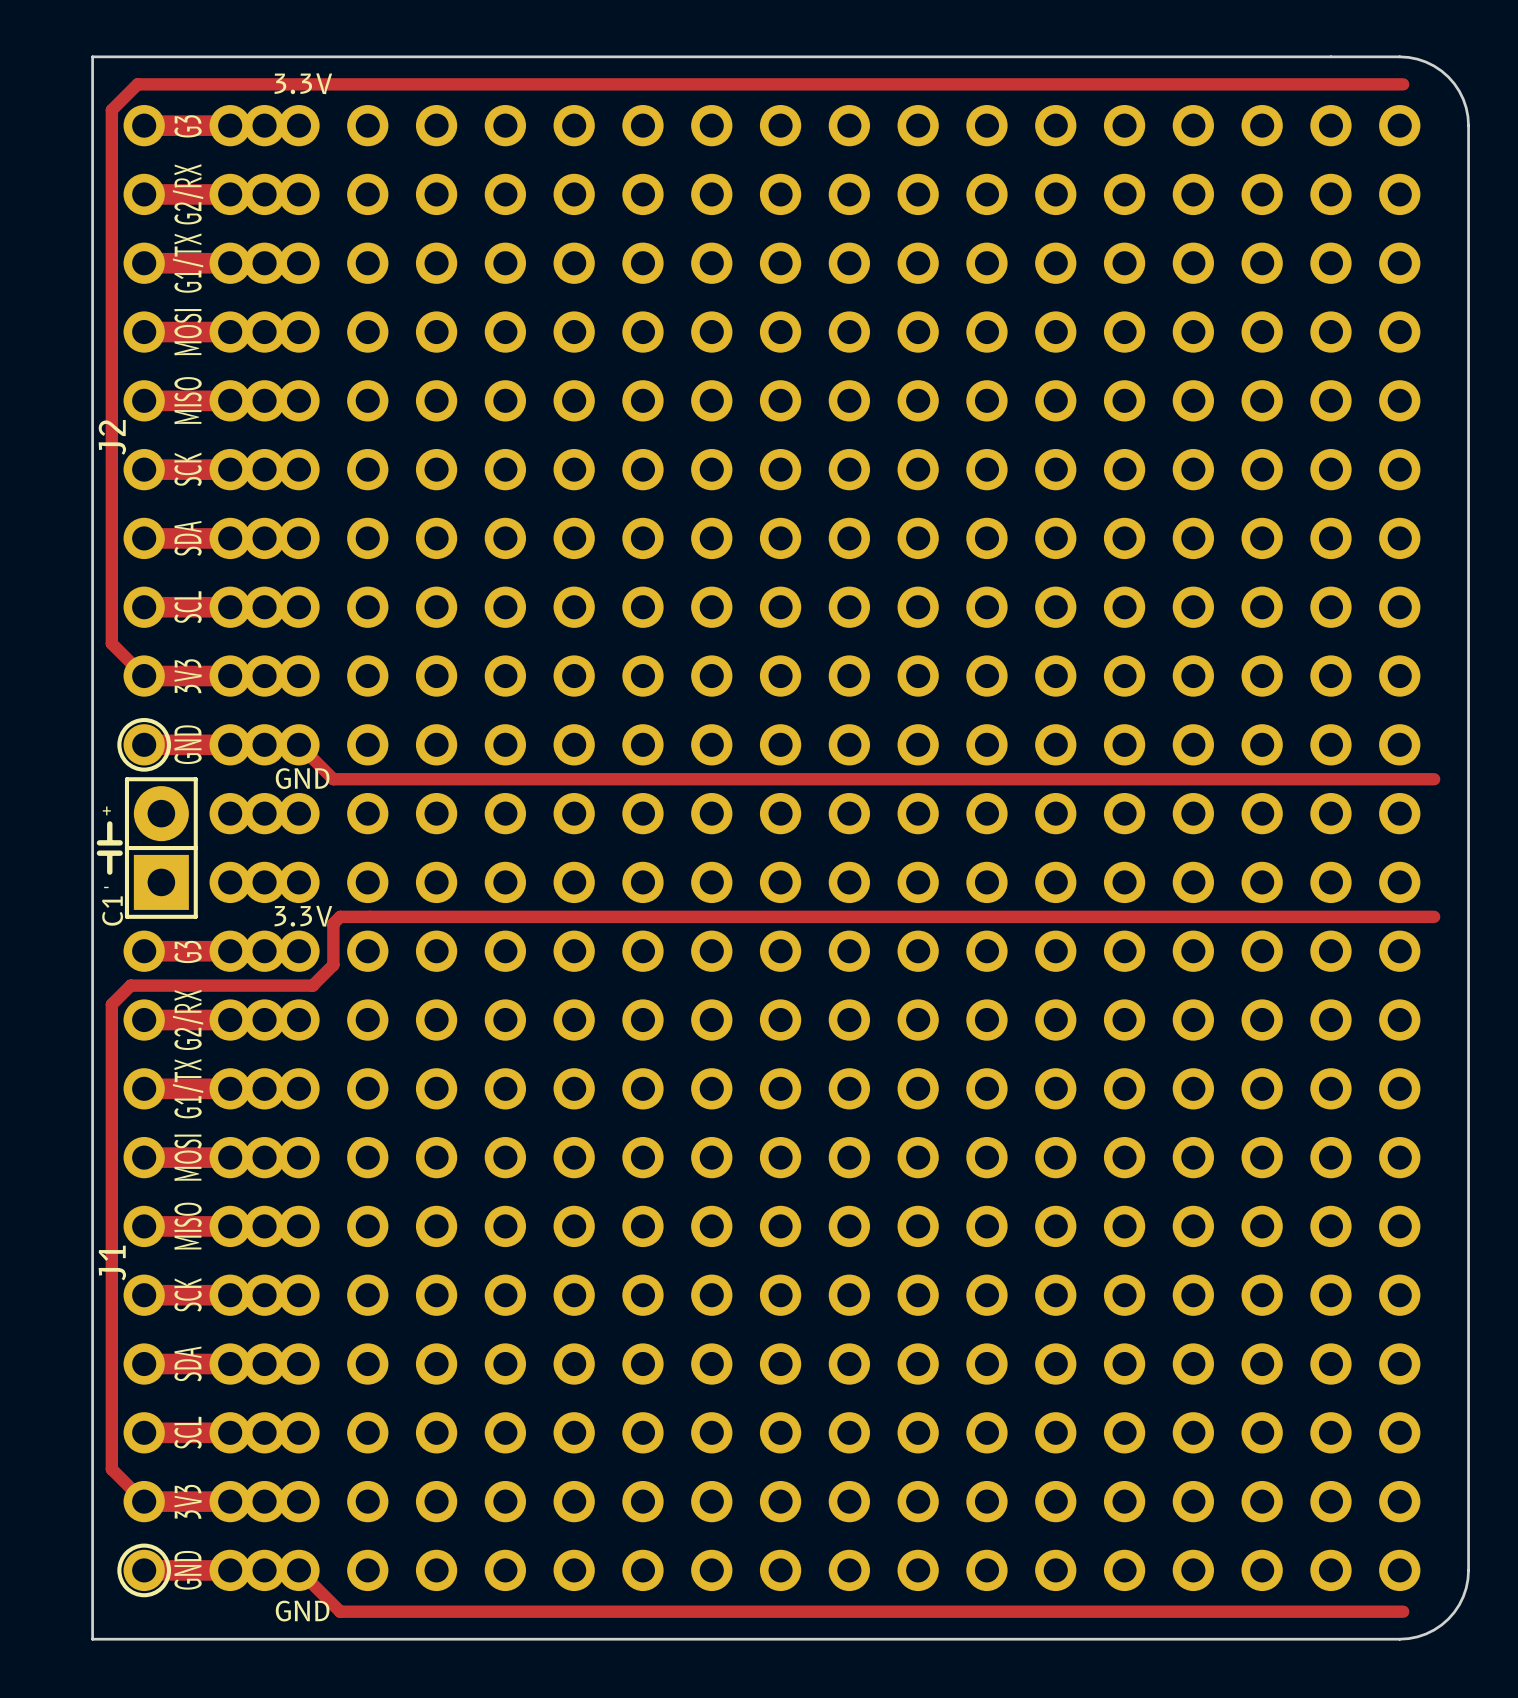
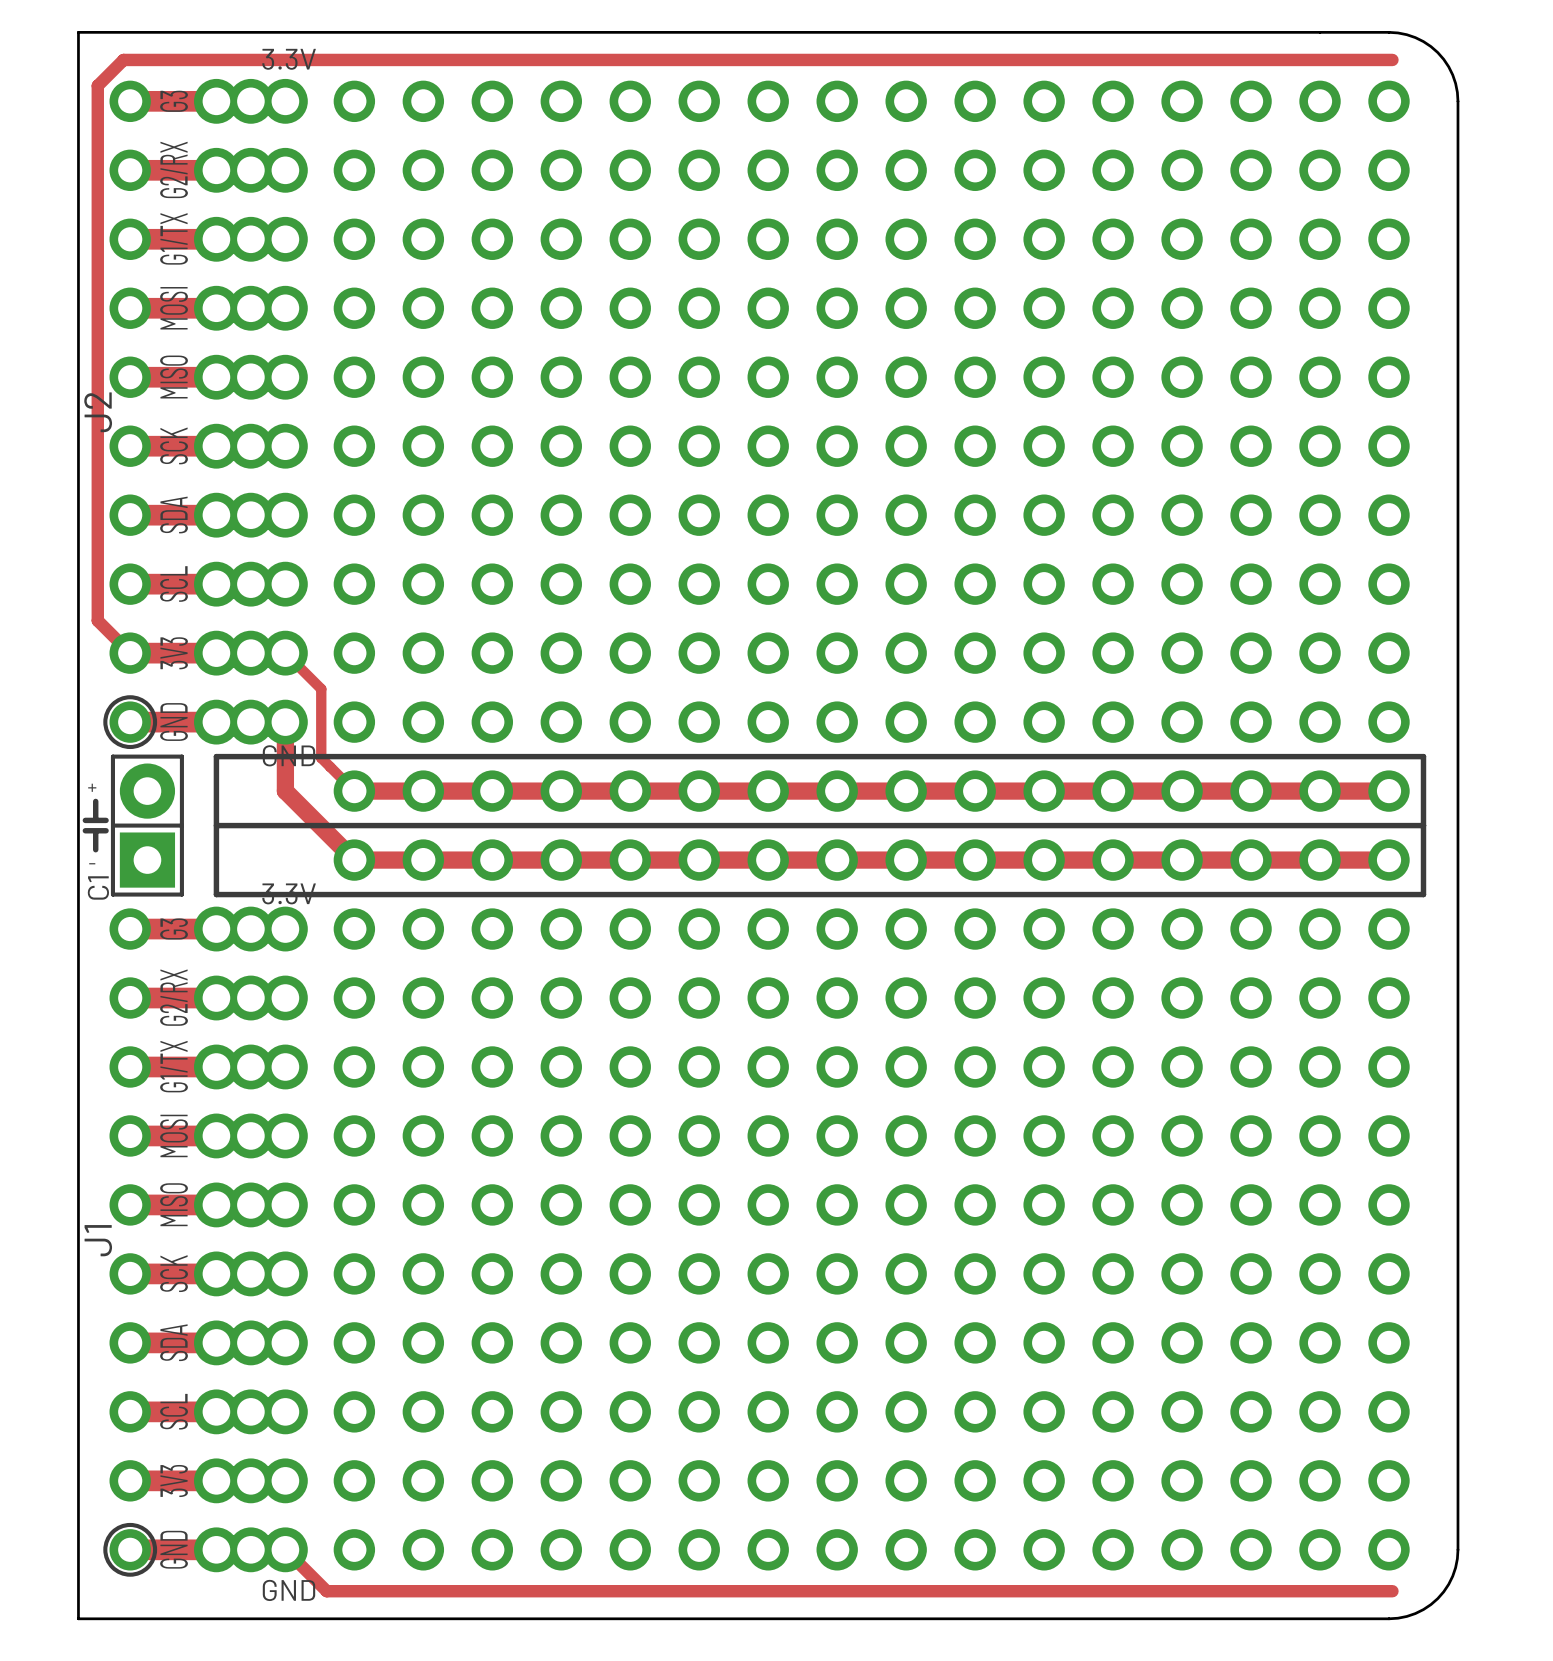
part: none -> (216, 411)
part: none -> (250, 411)
part: none -> (285, 411)
track: none -> (285, 653) (321, 689) (321, 757) (354, 791) (1389, 791)
track: (298, 744) (333, 779) (1434, 779) -> (285, 722) (285, 791) (354, 860) (1389, 860)
line: none -> (216, 756) (1423, 756) (1423, 894) (216, 894) (216, 756)
line: none -> (216, 825) (1423, 825)
part: (230, 848) -> none
part: (264, 848) -> none
part: (298, 848) -> none
track: (1434, 916) (340, 916) (333, 923) (333, 964) (312, 985) (130, 985) (111, 1004) (111, 1469) (144, 1501) -> none
part: none -> (216, 1239)
part: none -> (250, 1239)
part: none -> (285, 1239)

